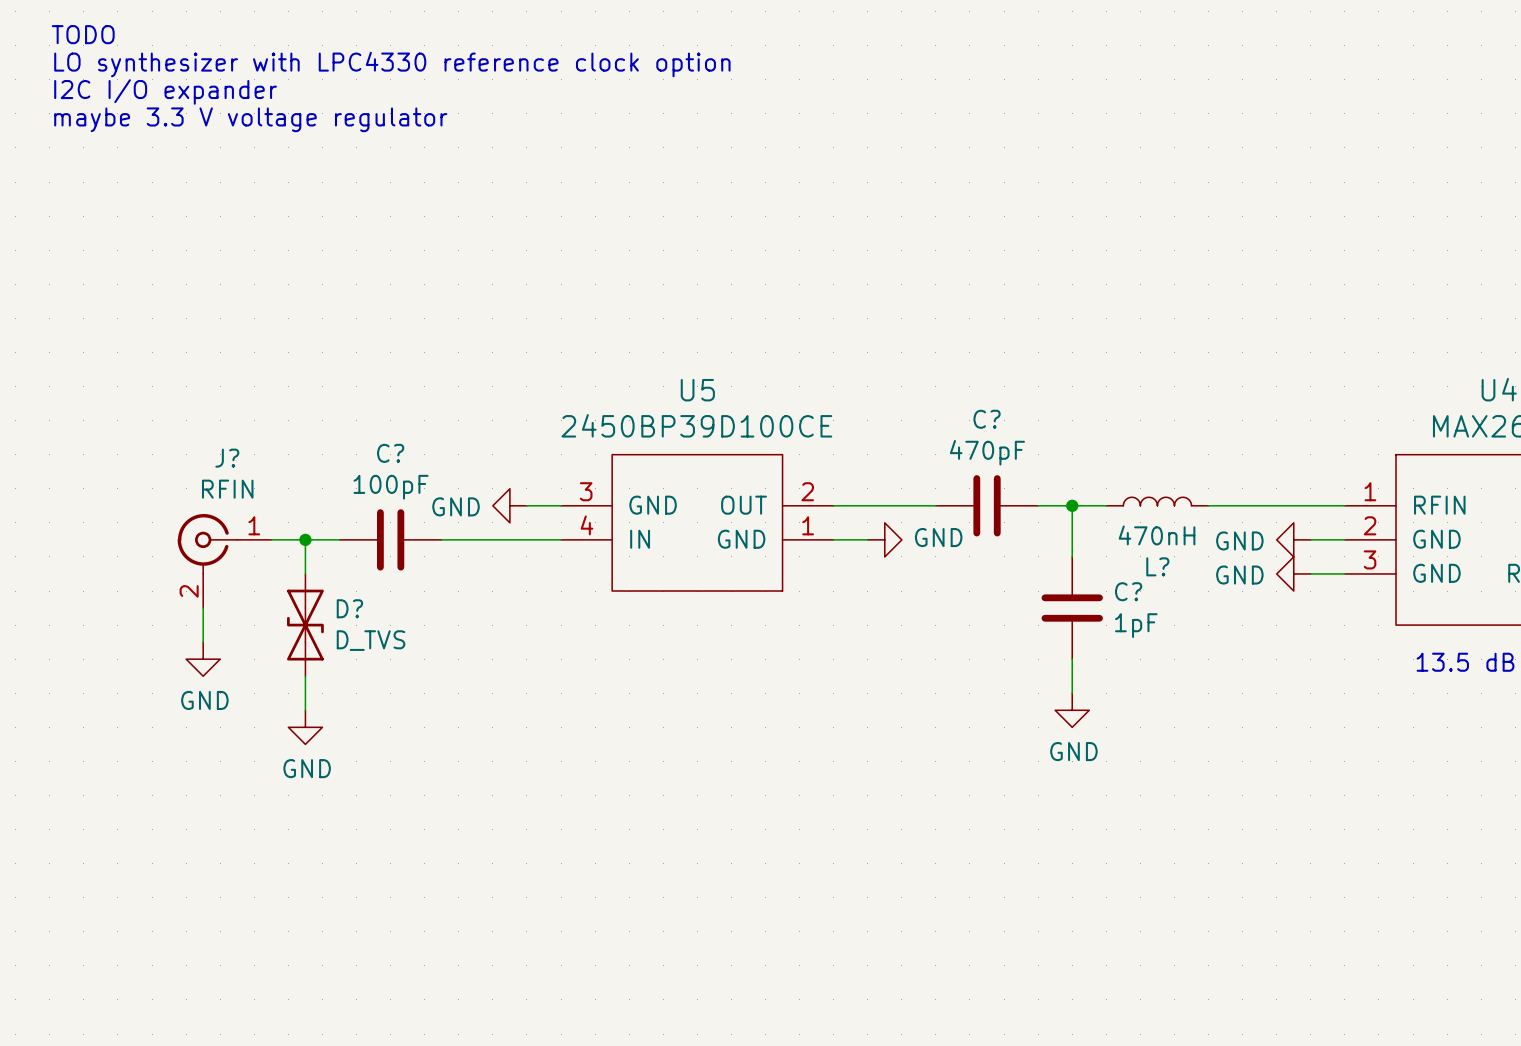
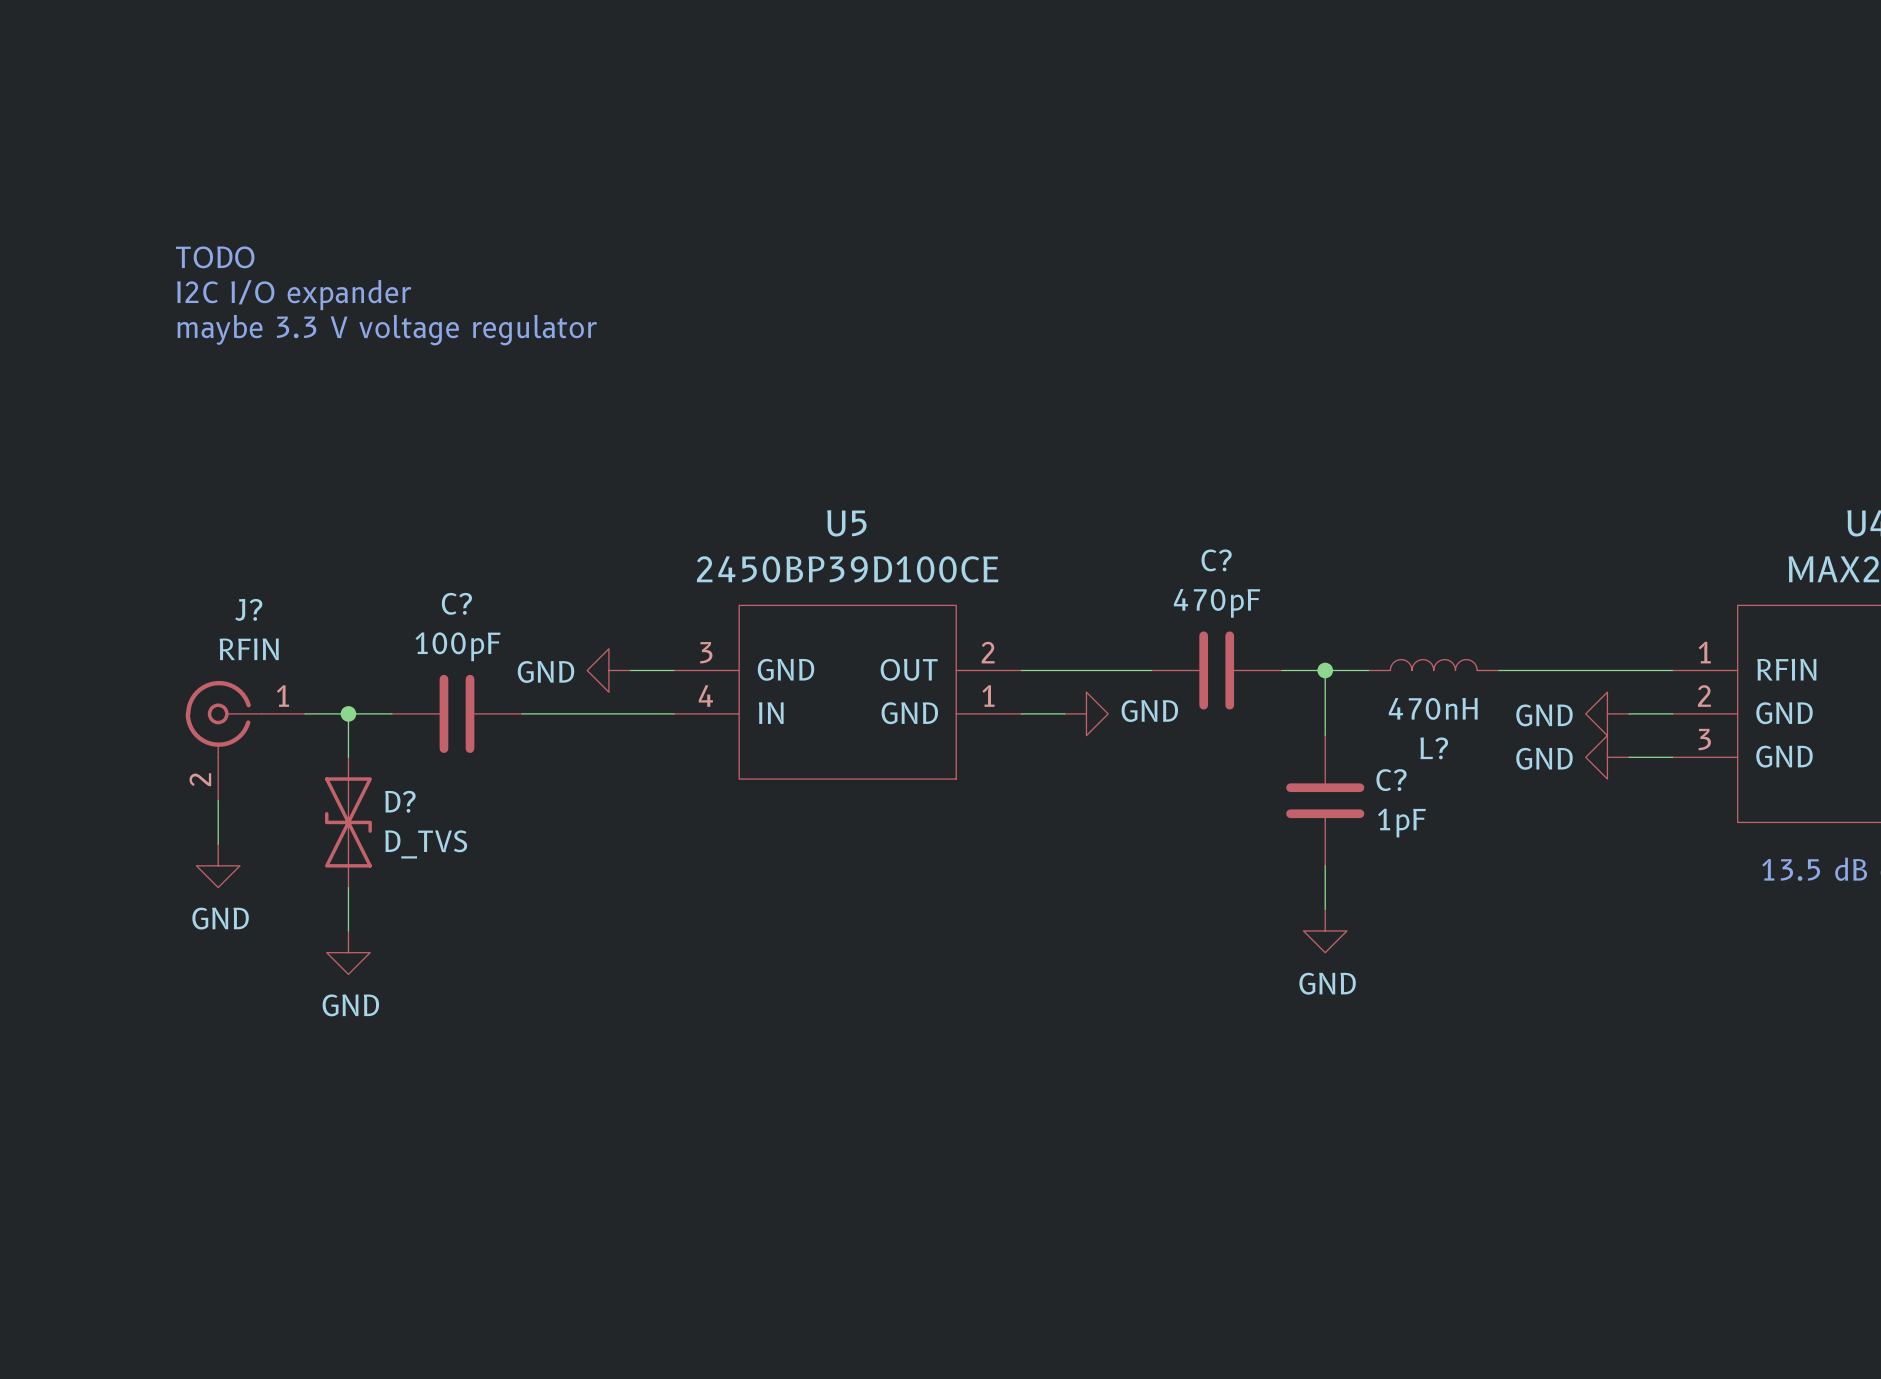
text position: TODO (83, 34) -> TODO (215, 257)
text: LO synthesizer with LPC4330 reference clock option (392, 64) -> none
text position: I2C I/O expander (165, 91) -> I2C I/O expander (294, 295)
text position: maybe 3.3 V voltage regulator (250, 119) -> maybe 3.3 V voltage regulator (387, 330)

